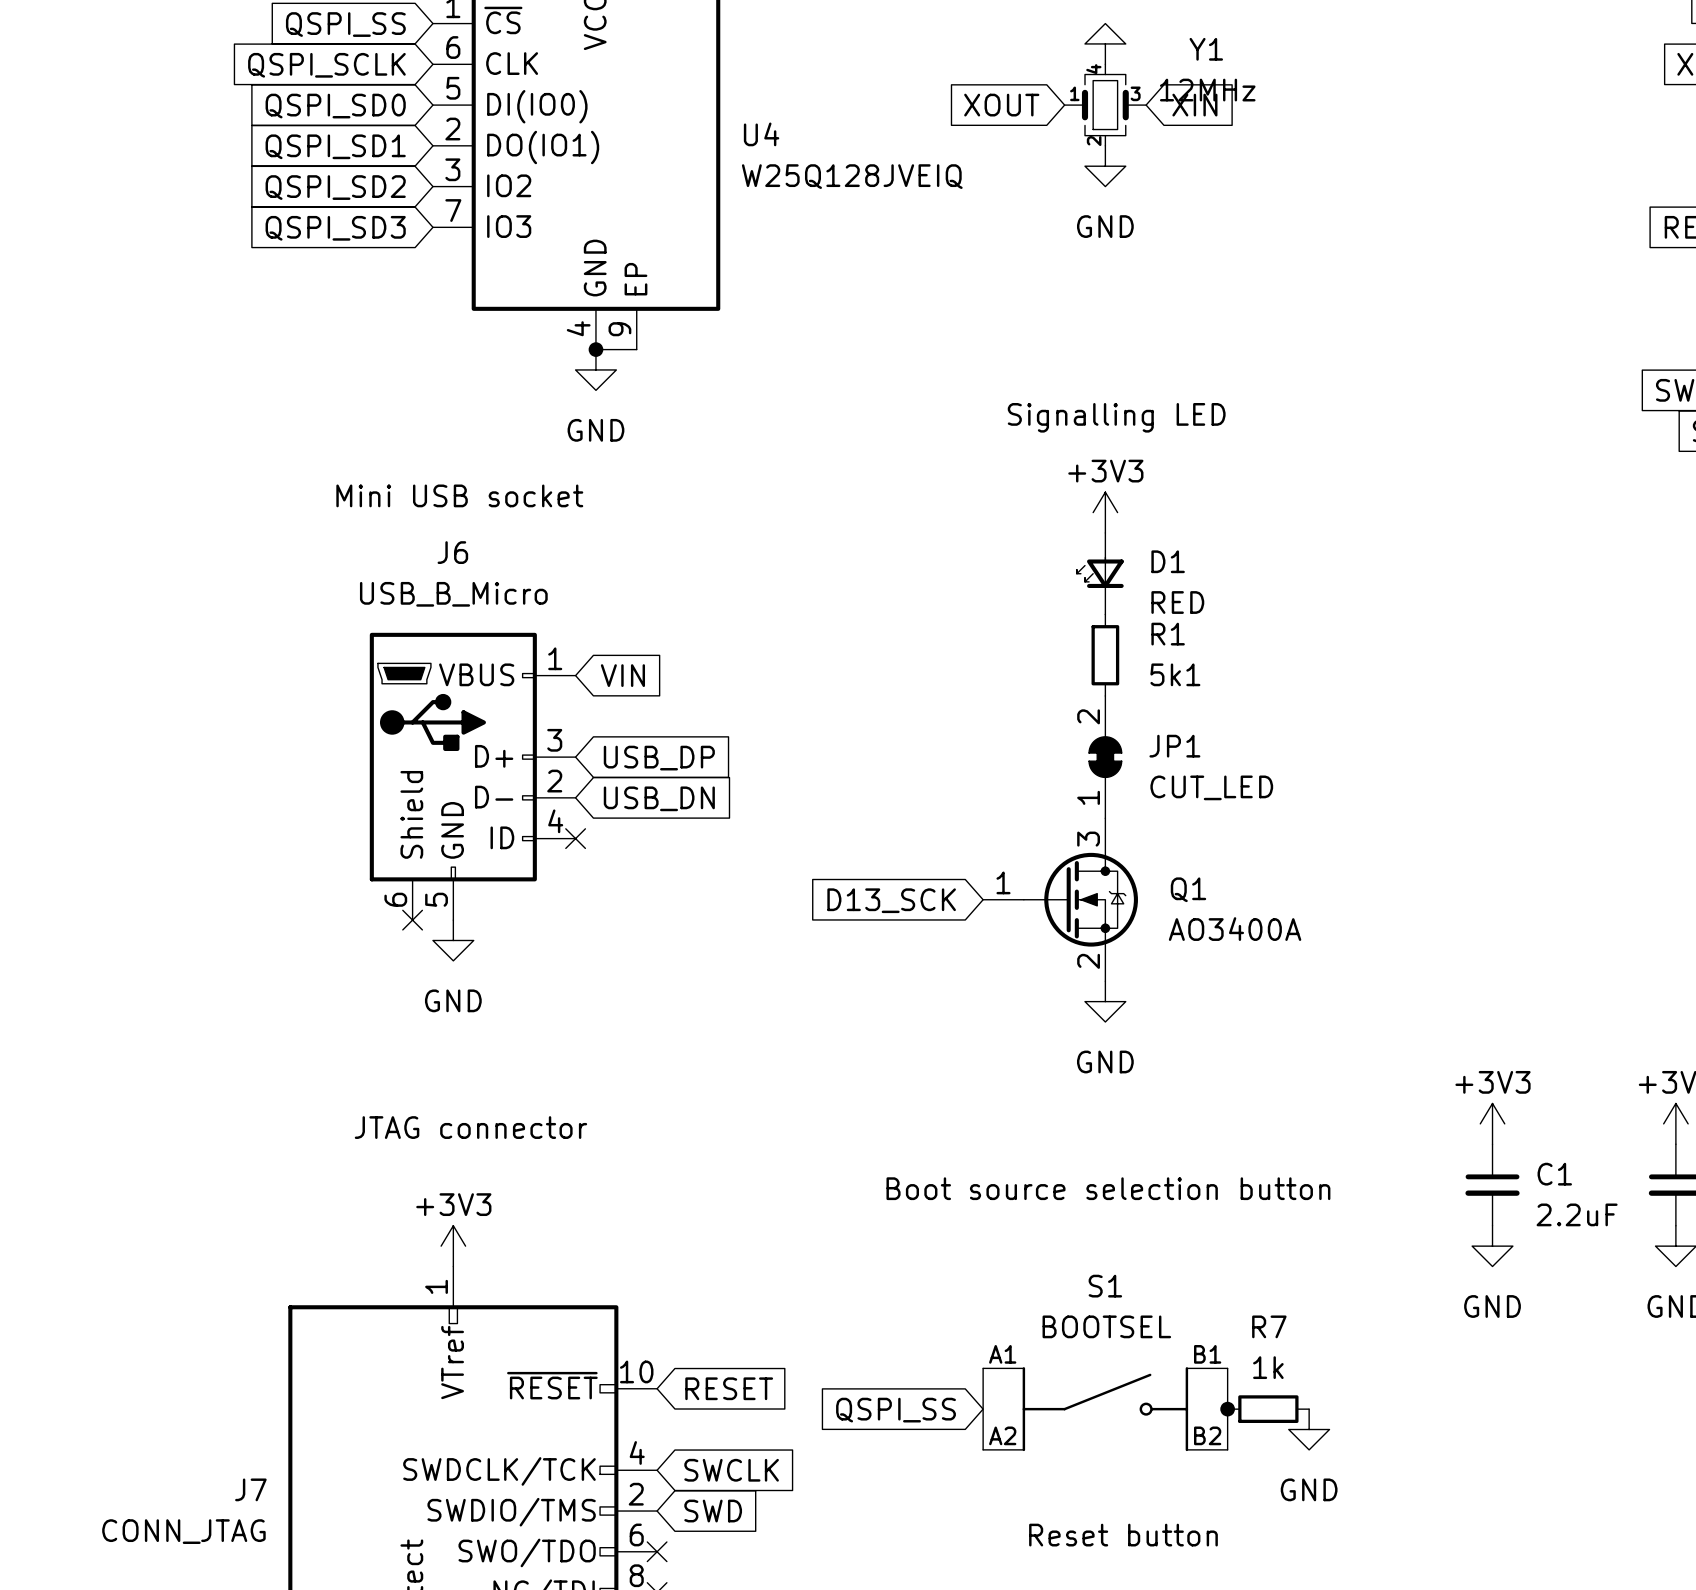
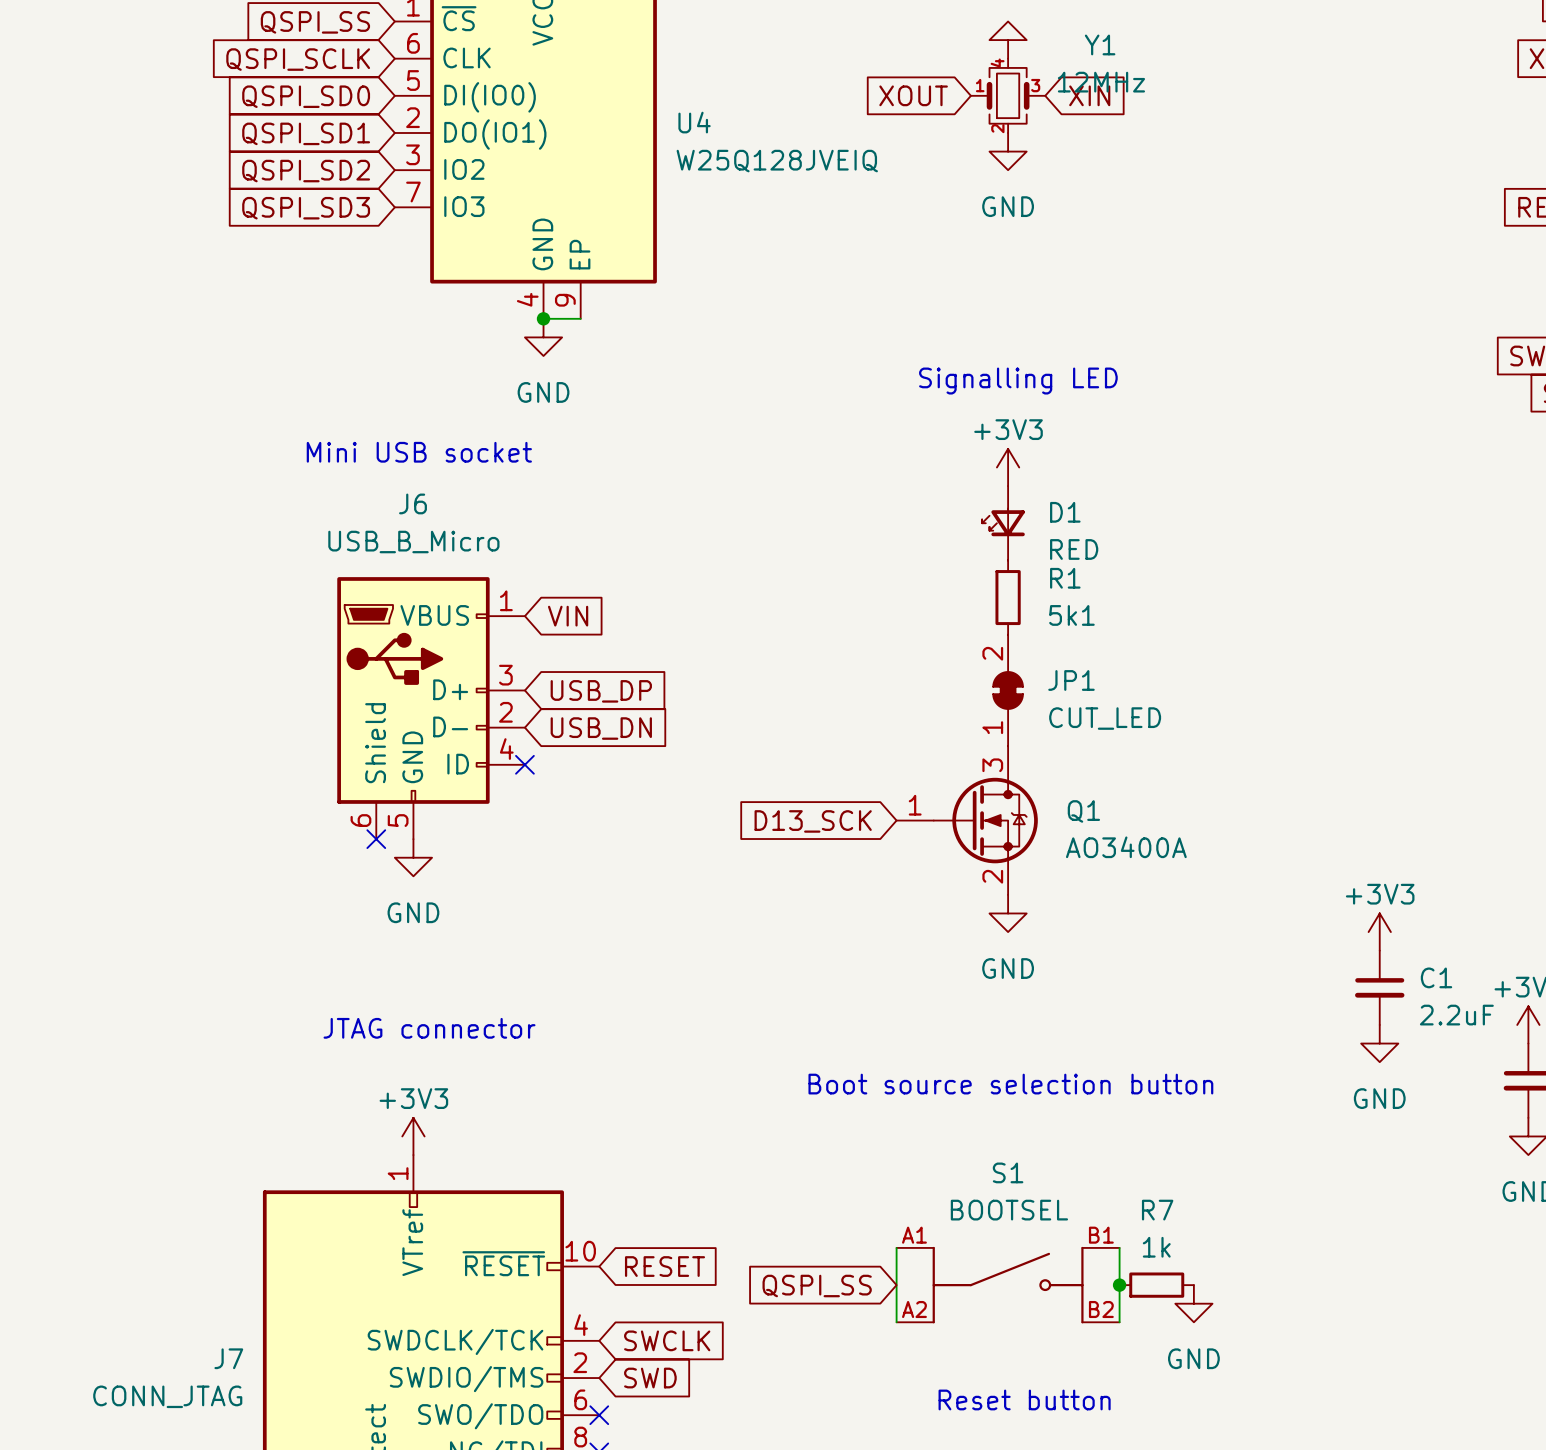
power symbol position: +3V3 (1492, 1123) -> +3V3 (1379, 932)
C1 position: (1492, 1185) -> (1379, 987)
power symbol position: GND (1492, 1246) -> GND (1379, 1043)

